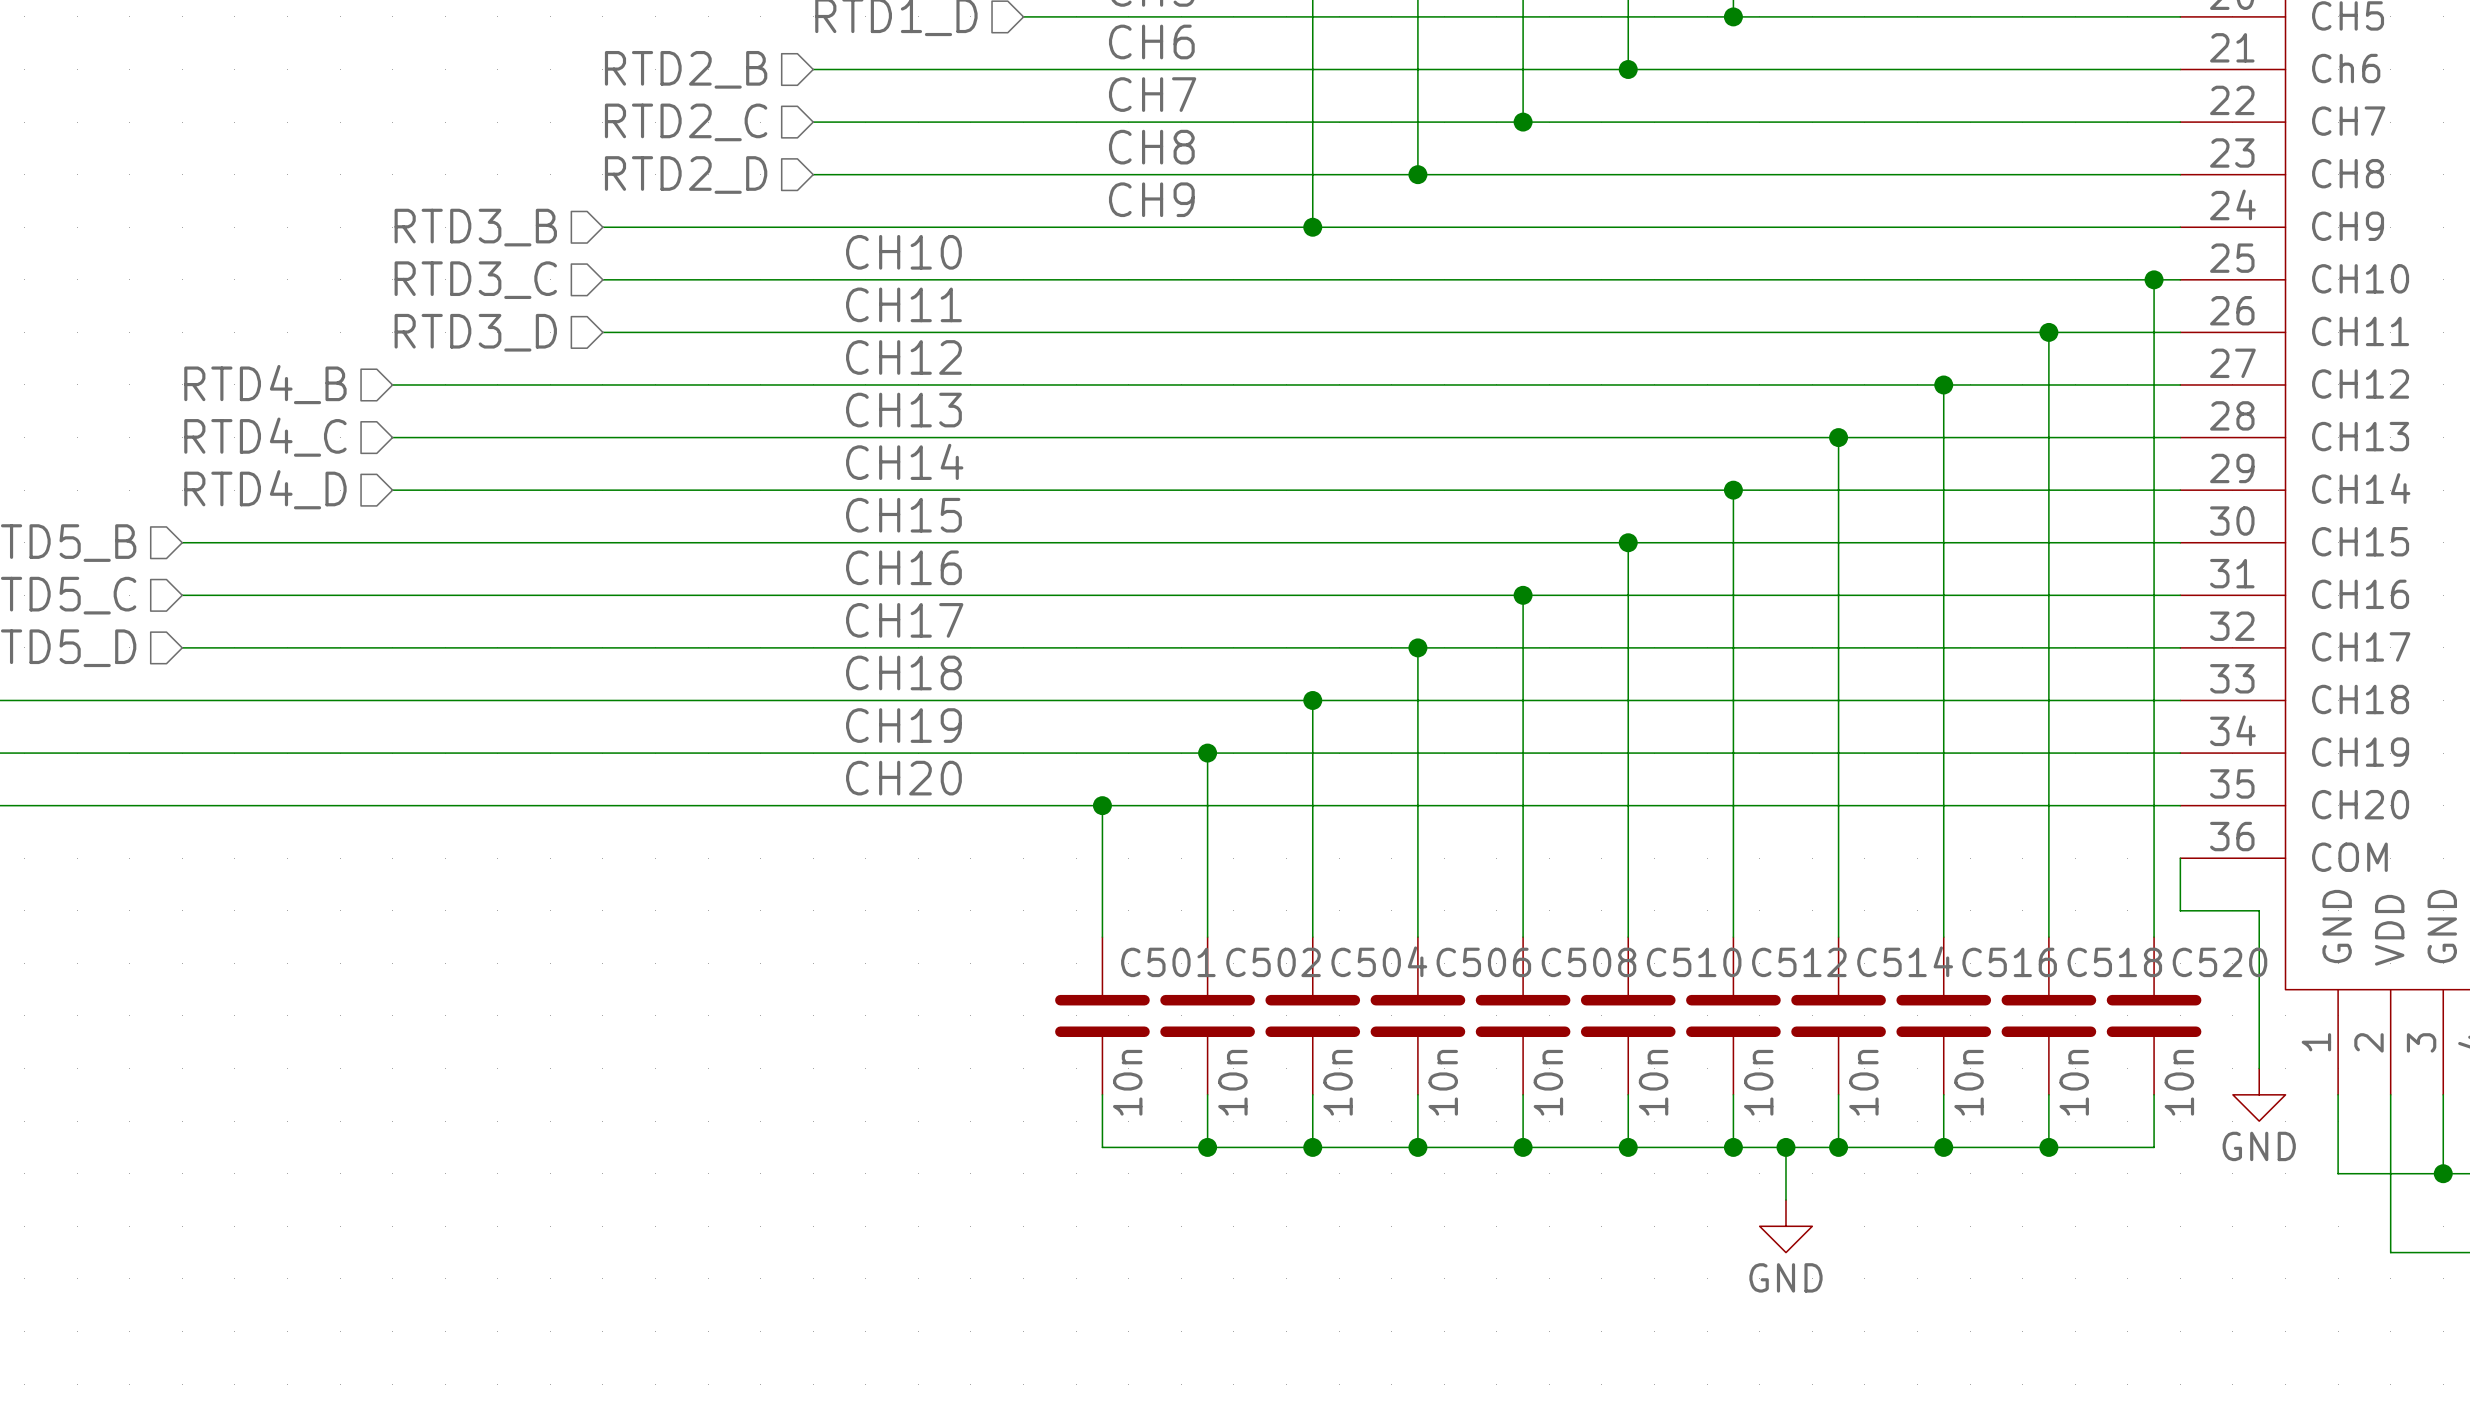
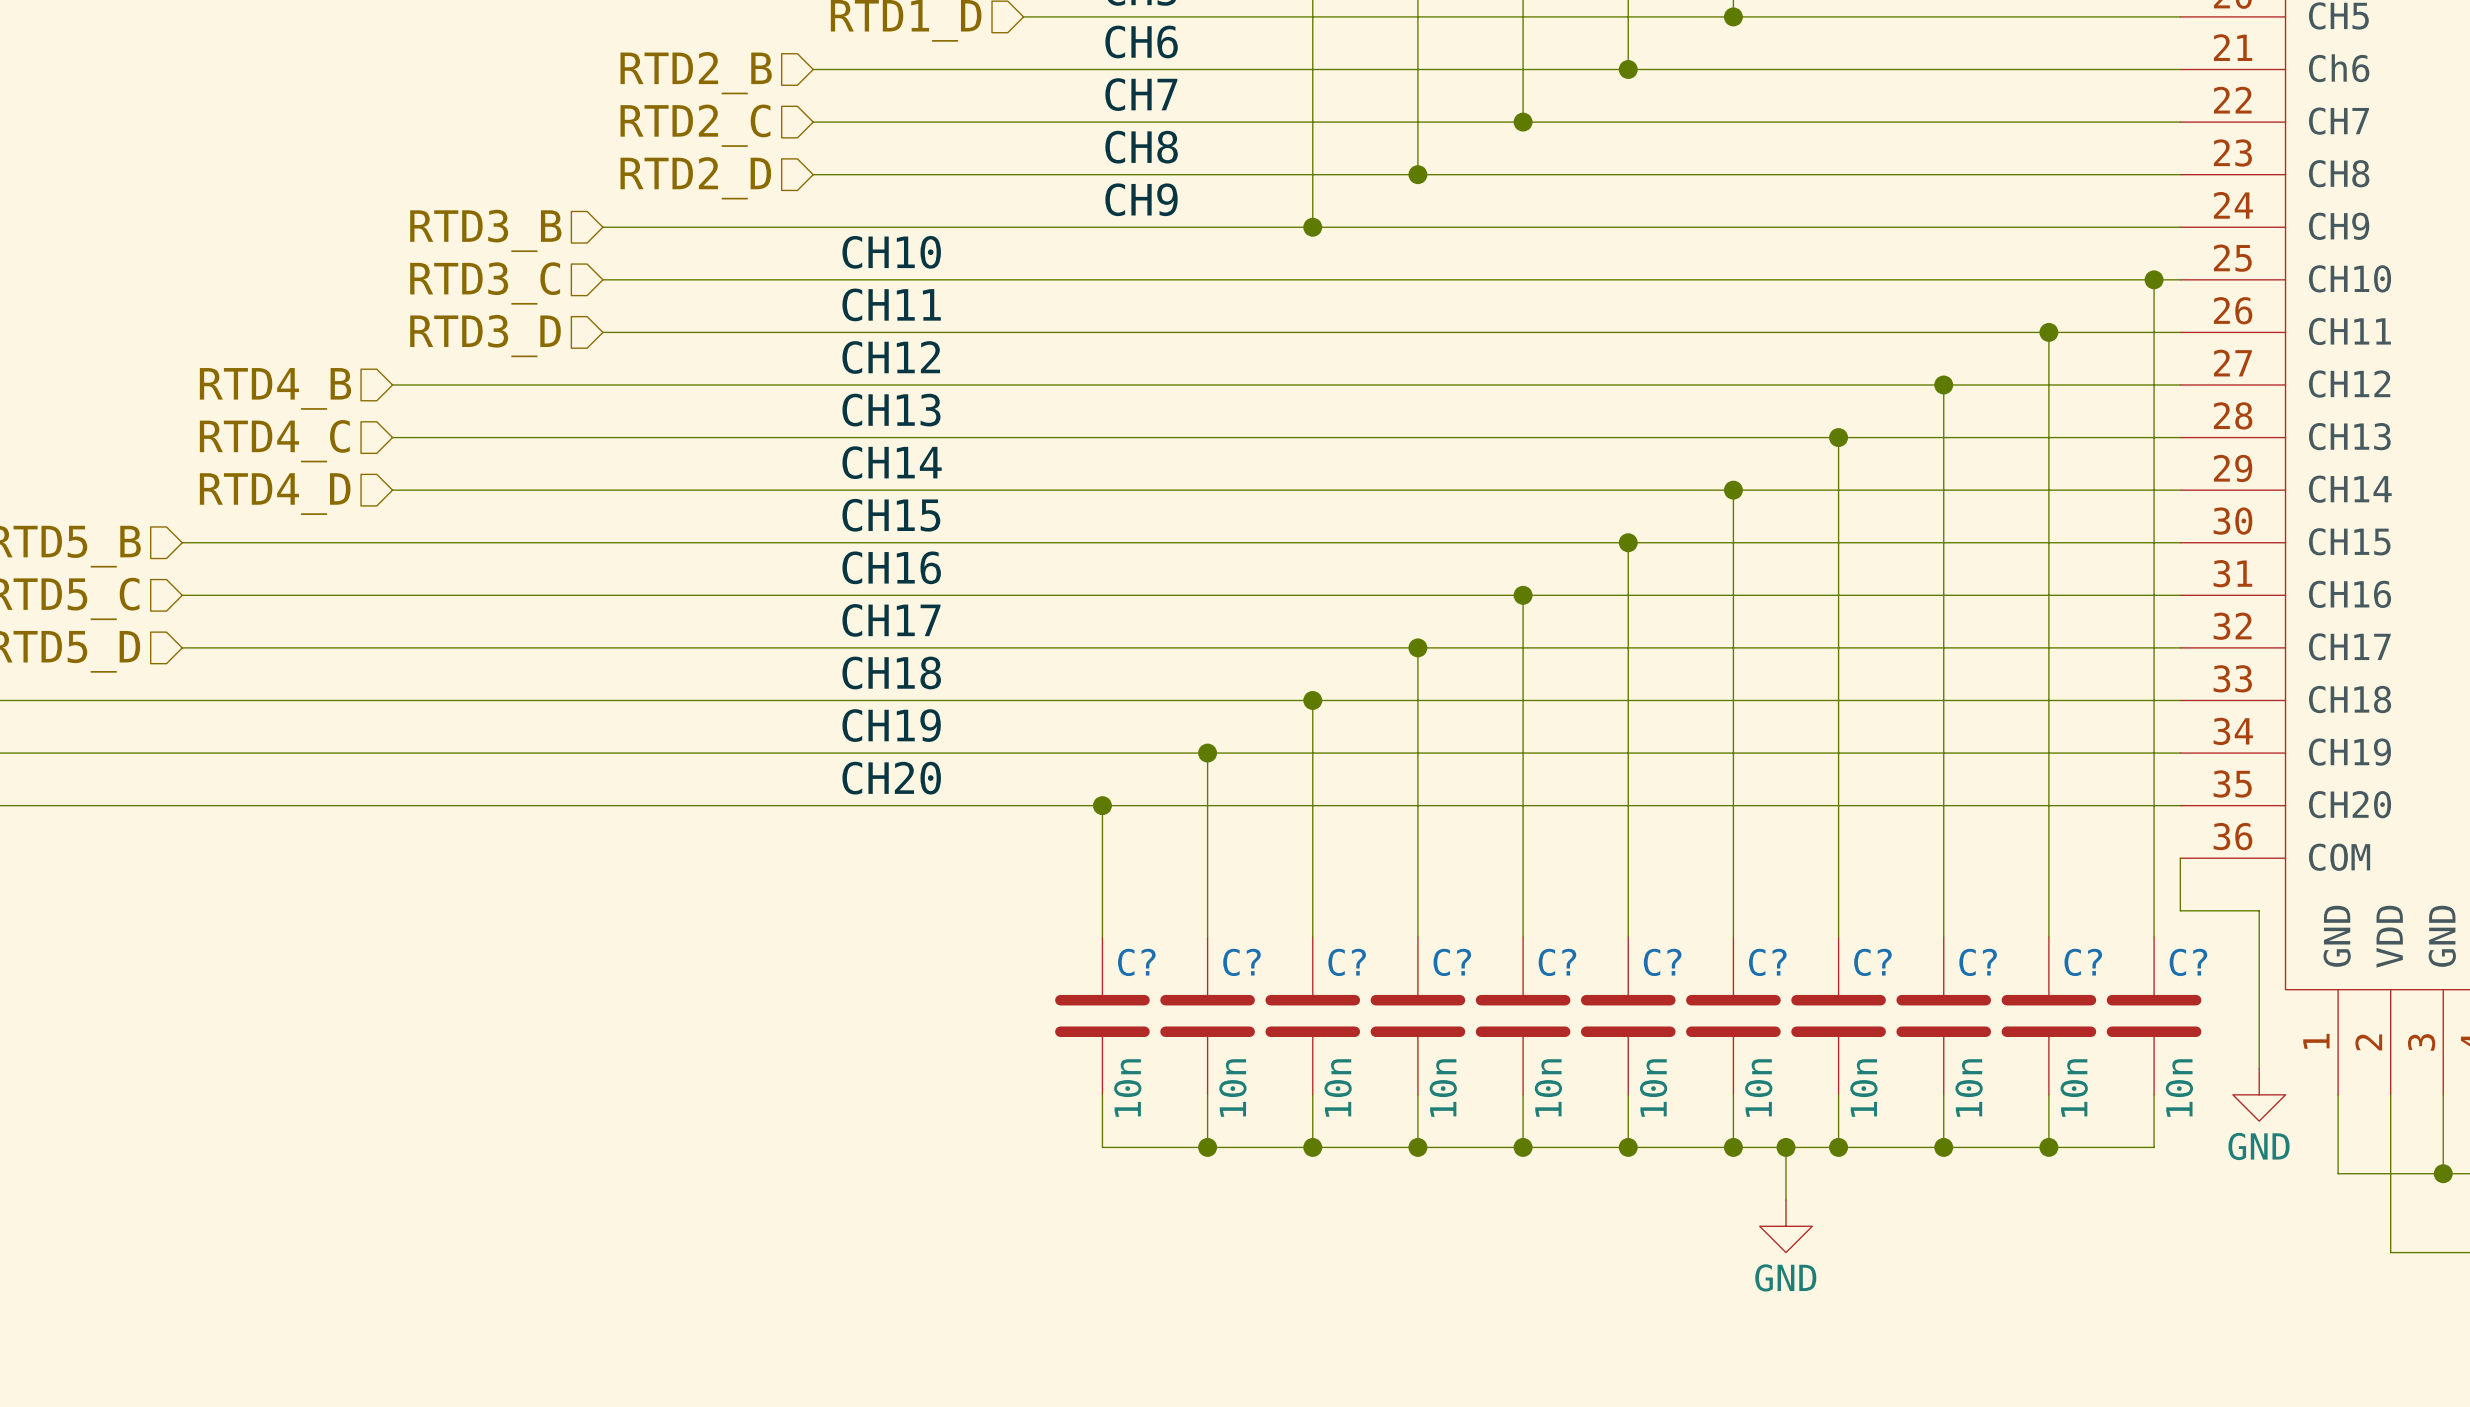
C504 name: C504 (1379, 961) -> C? (1347, 962)
C514 name: C514 (1905, 961) -> C? (1872, 962)
C501 name: C501 (1168, 962) -> C? (1136, 962)
C502 name: C502 (1273, 962) -> C? (1241, 962)
C506 name: C506 (1483, 962) -> C? (1452, 962)
C508 name: C508 (1589, 962) -> C? (1557, 962)
C510 name: C510 (1694, 962) -> C? (1662, 962)
C512 name: C512 (1799, 962) -> C? (1767, 962)
C516 name: C516 (2009, 962) -> C? (1978, 962)
C518 name: C518 (2114, 962) -> C? (2083, 962)
C520 name: C520 (2219, 962) -> C? (2188, 962)

